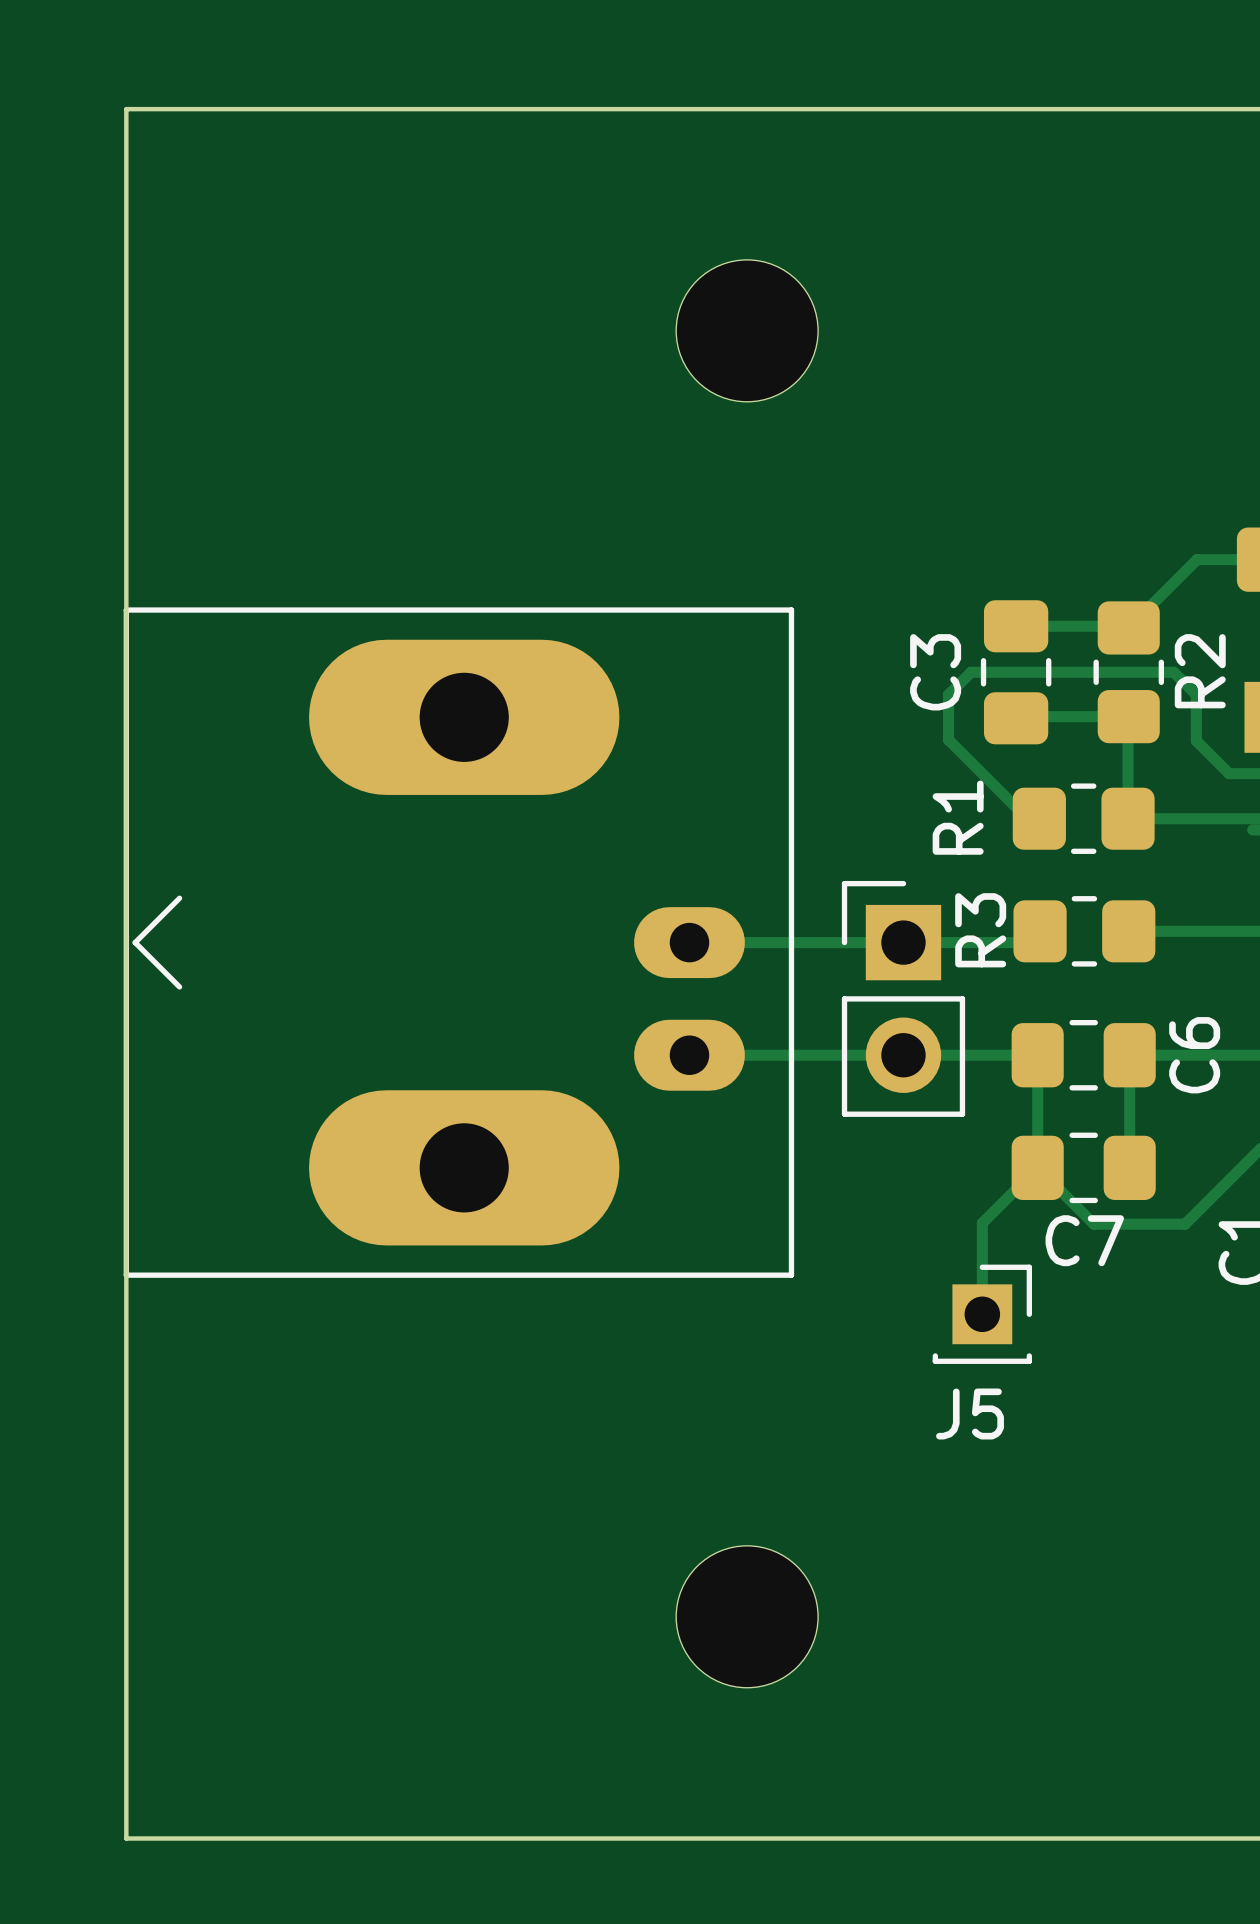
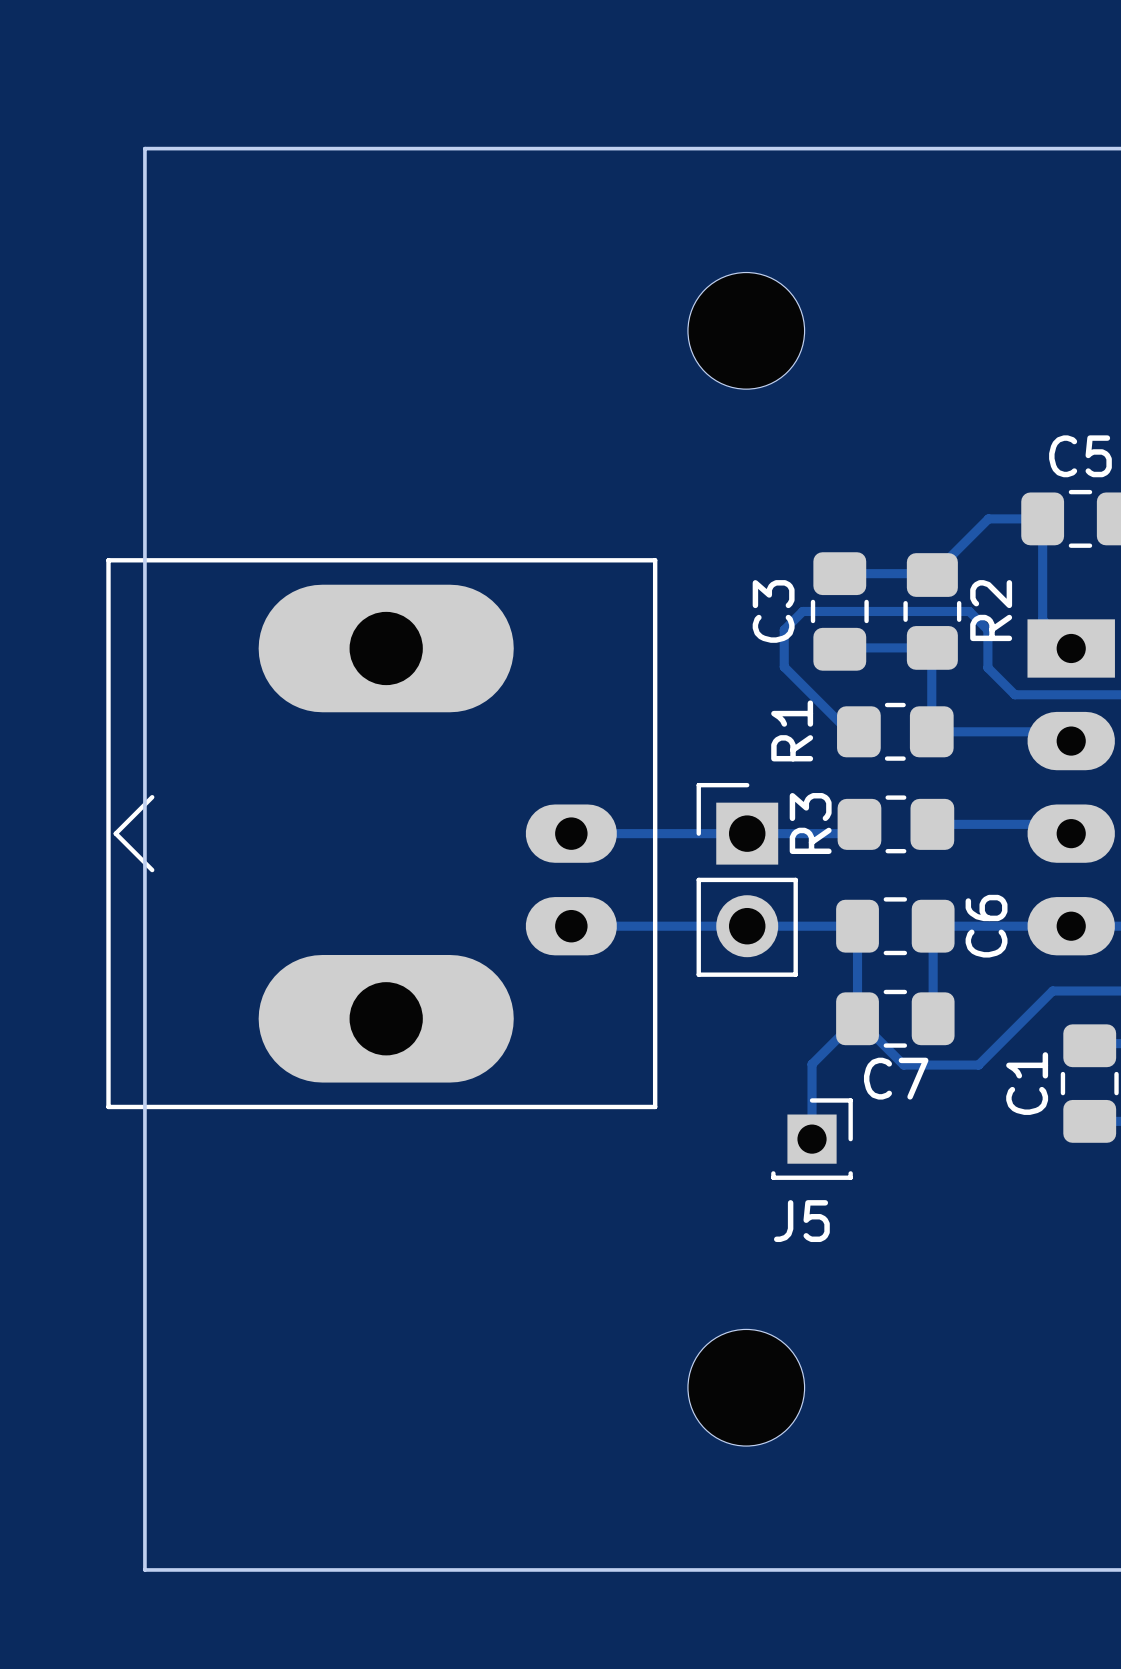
board edge: (170, 109) (126, 109) (126, 1838) (170, 1838) -> (144, 148) (144, 1569)
part position: (747, 330) -> (746, 330)
part position: (747, 1616) -> (746, 1387)

